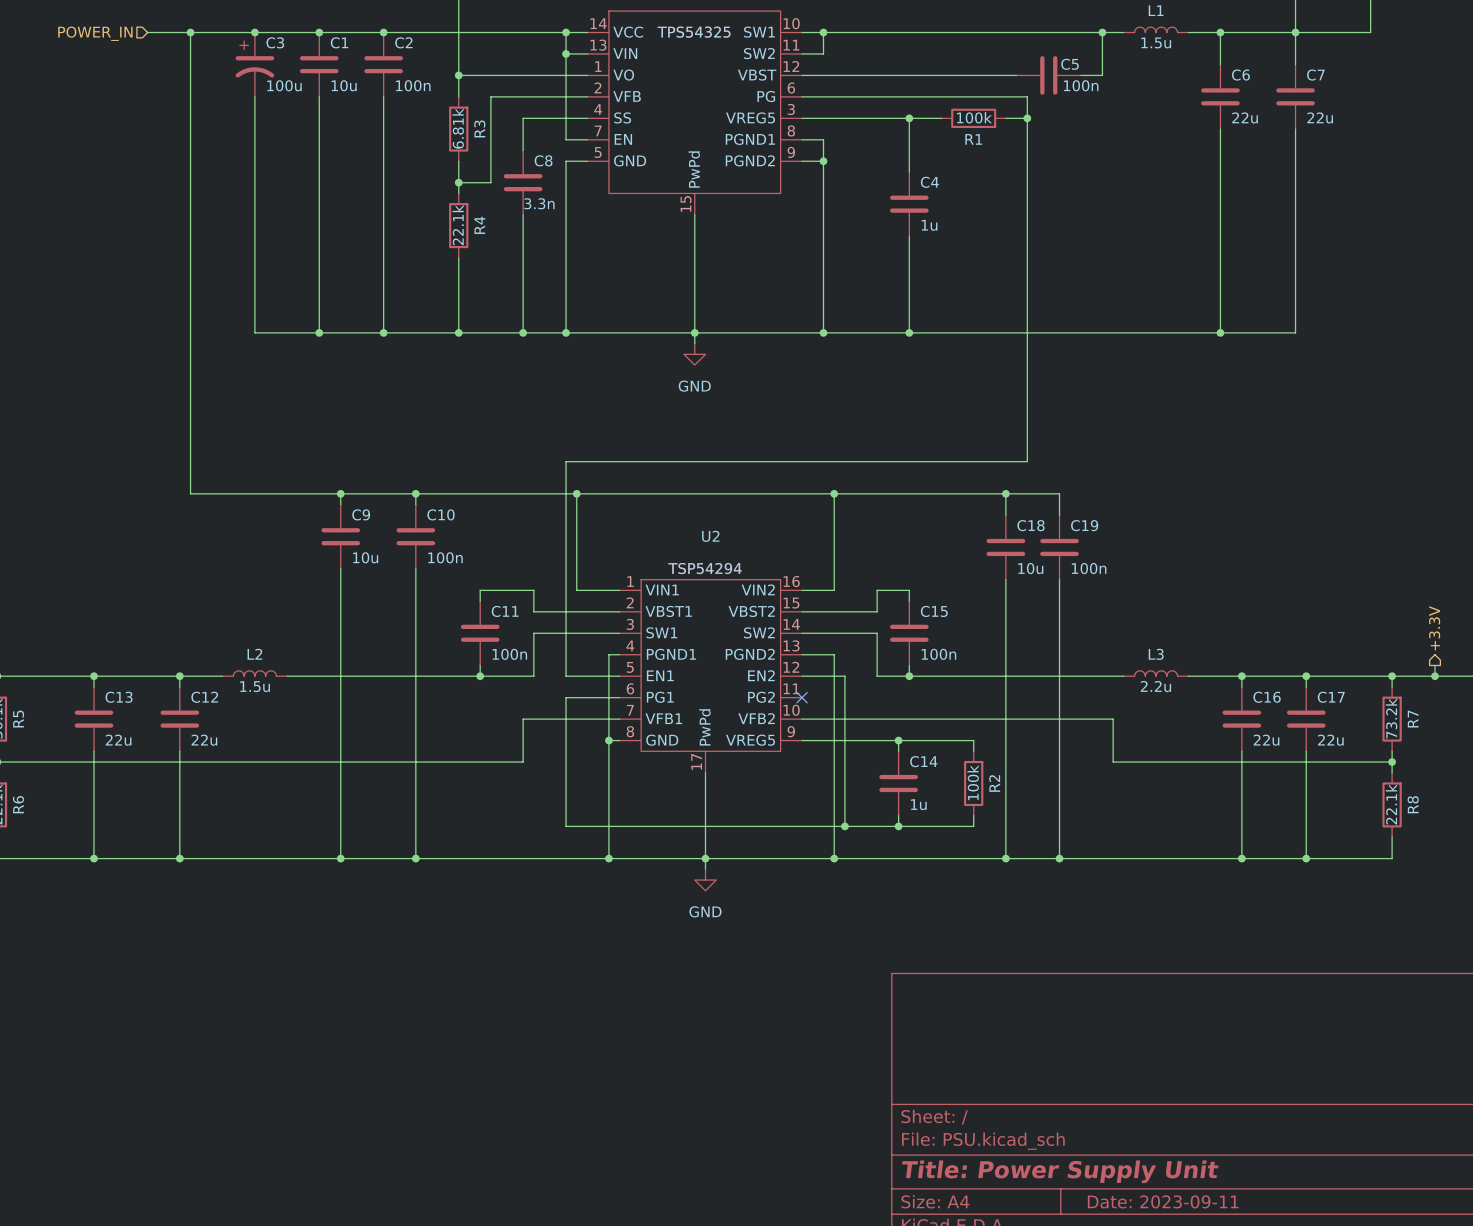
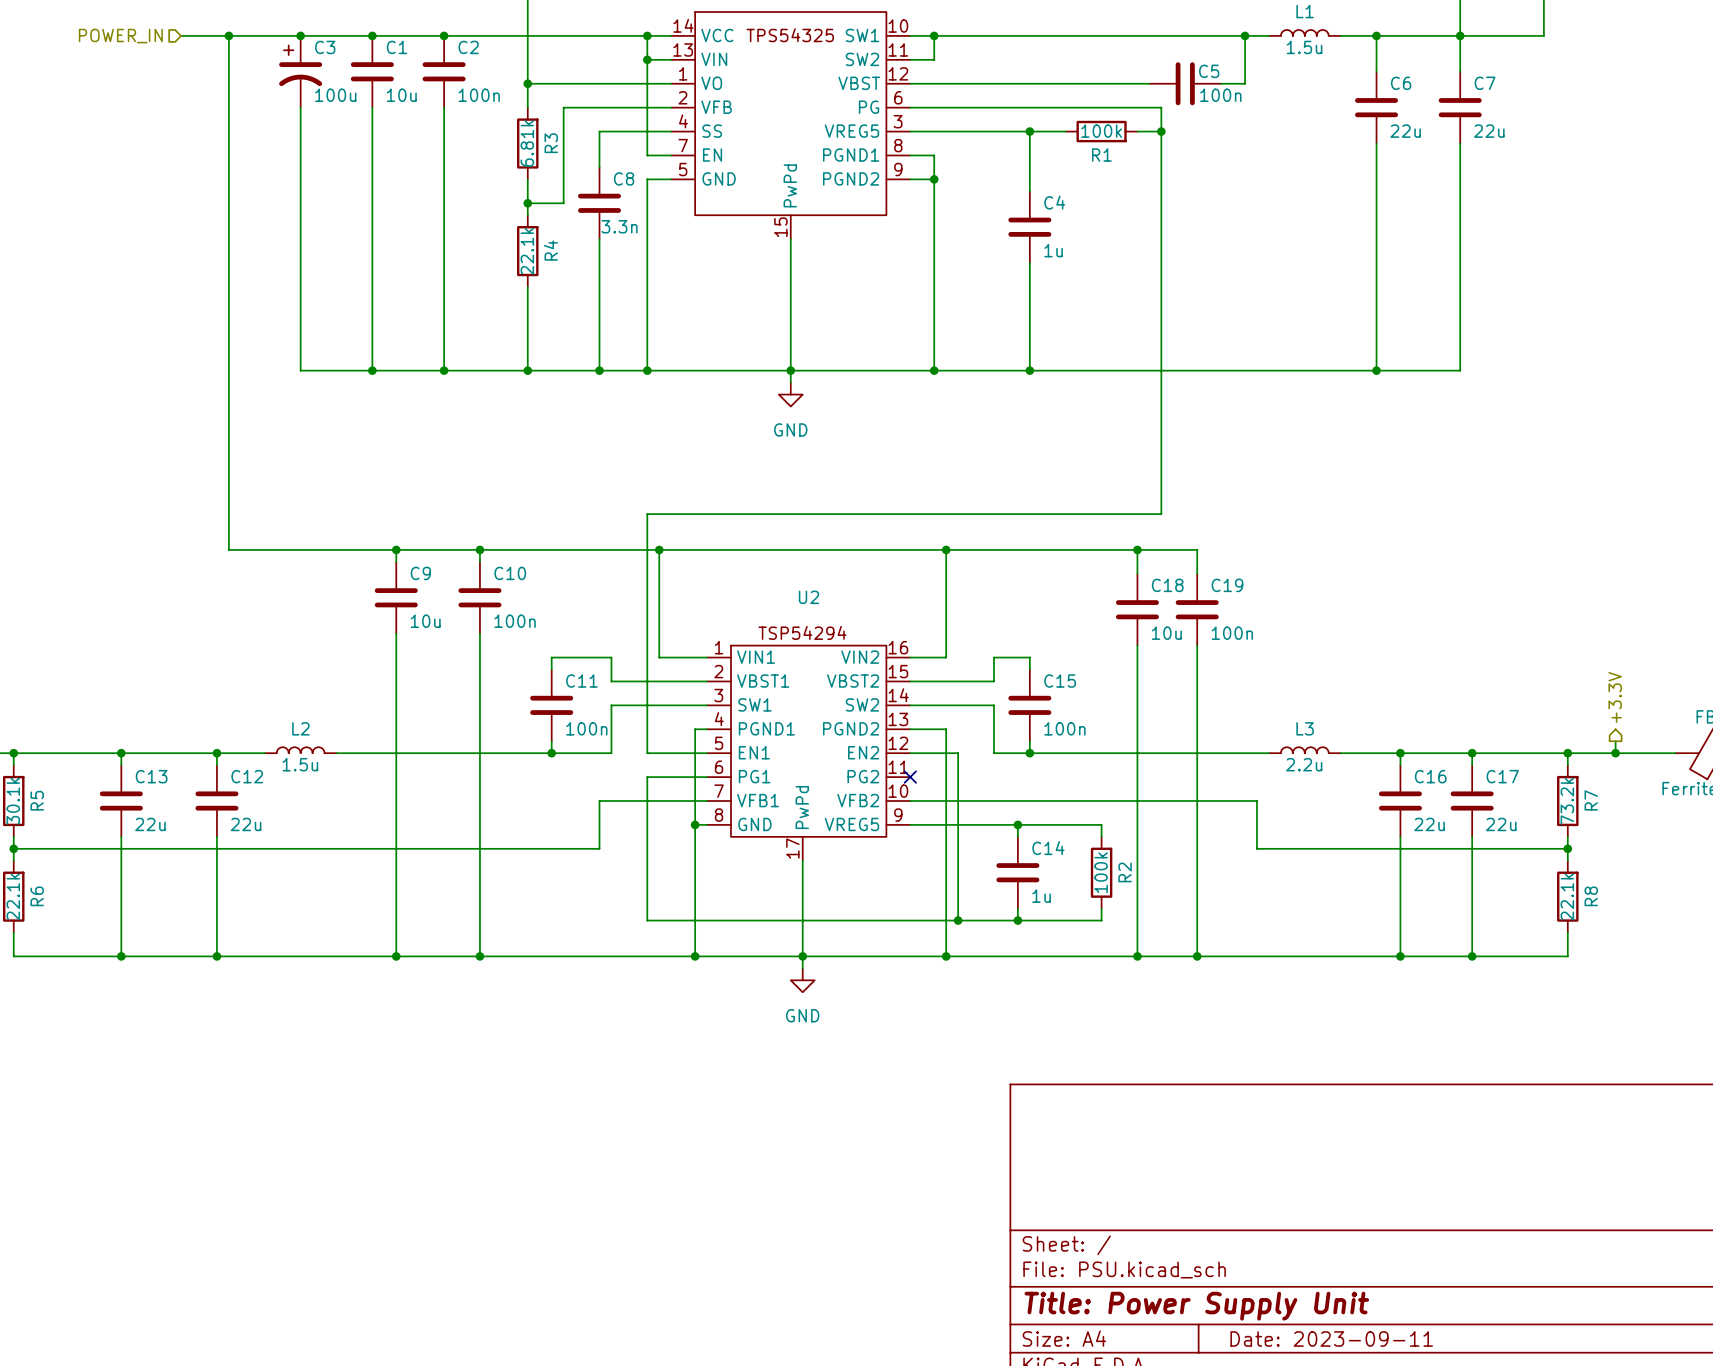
part value: TPS54325 (694, 32) -> none
U2 value: TSP54294 (705, 568) -> none

